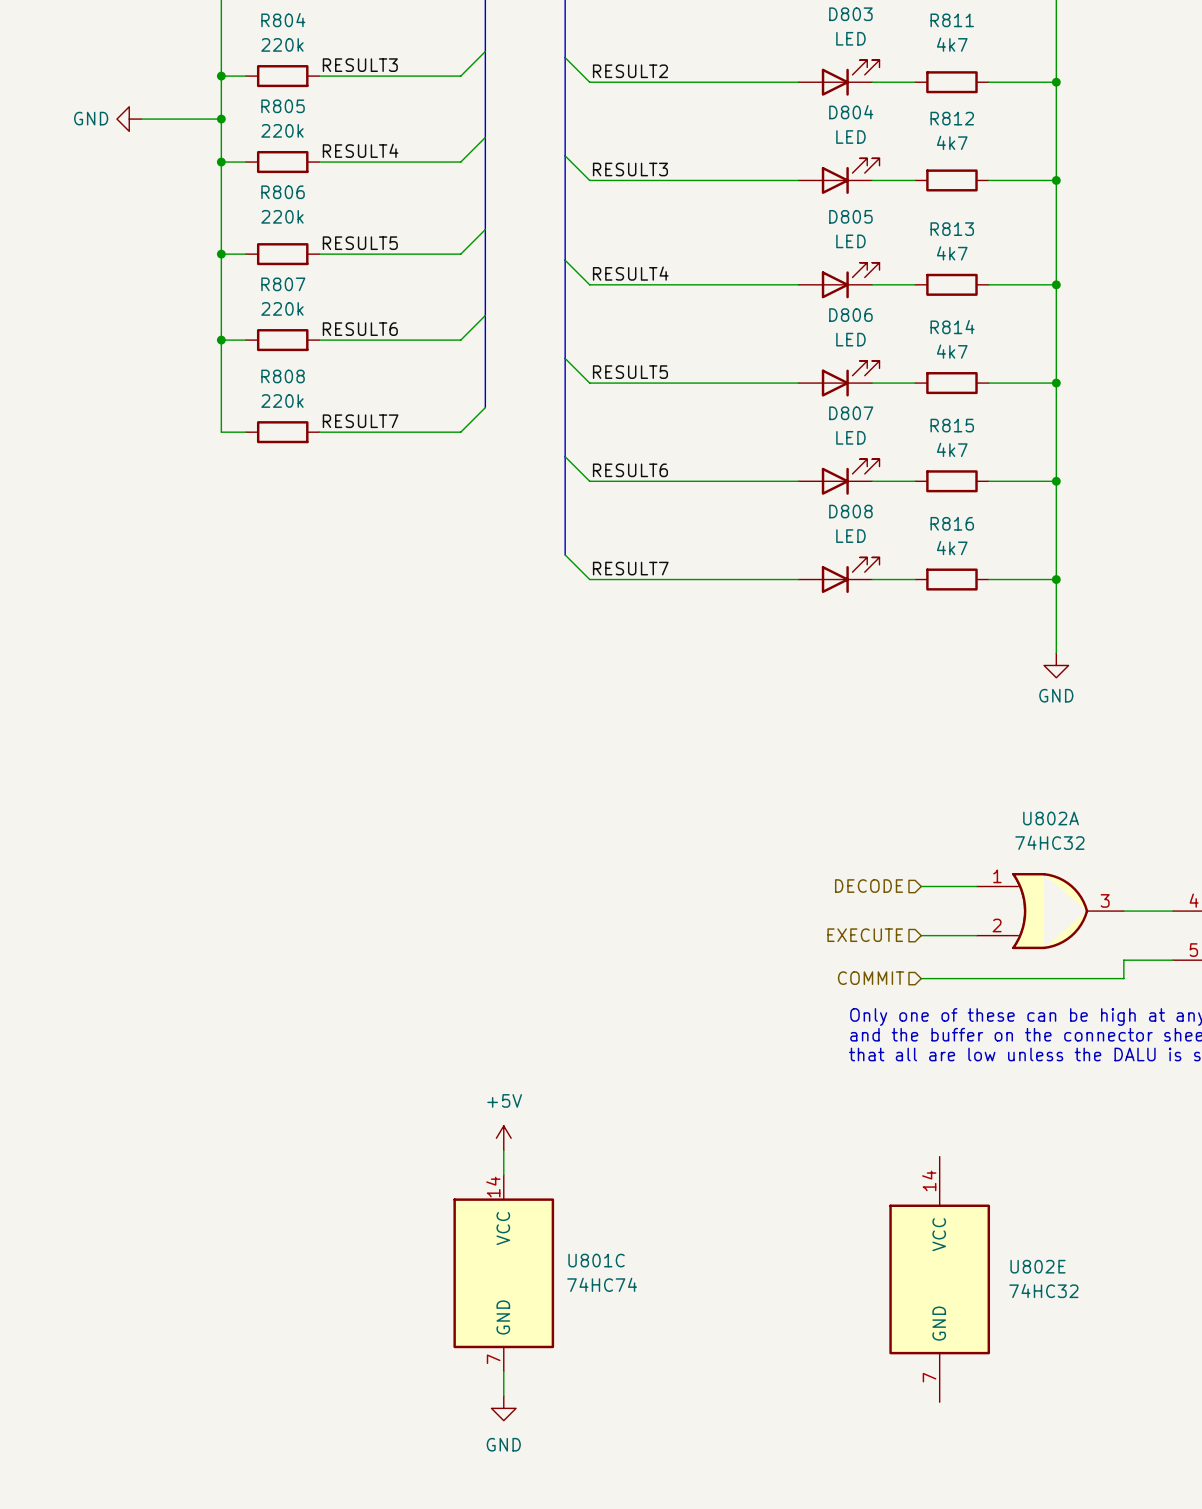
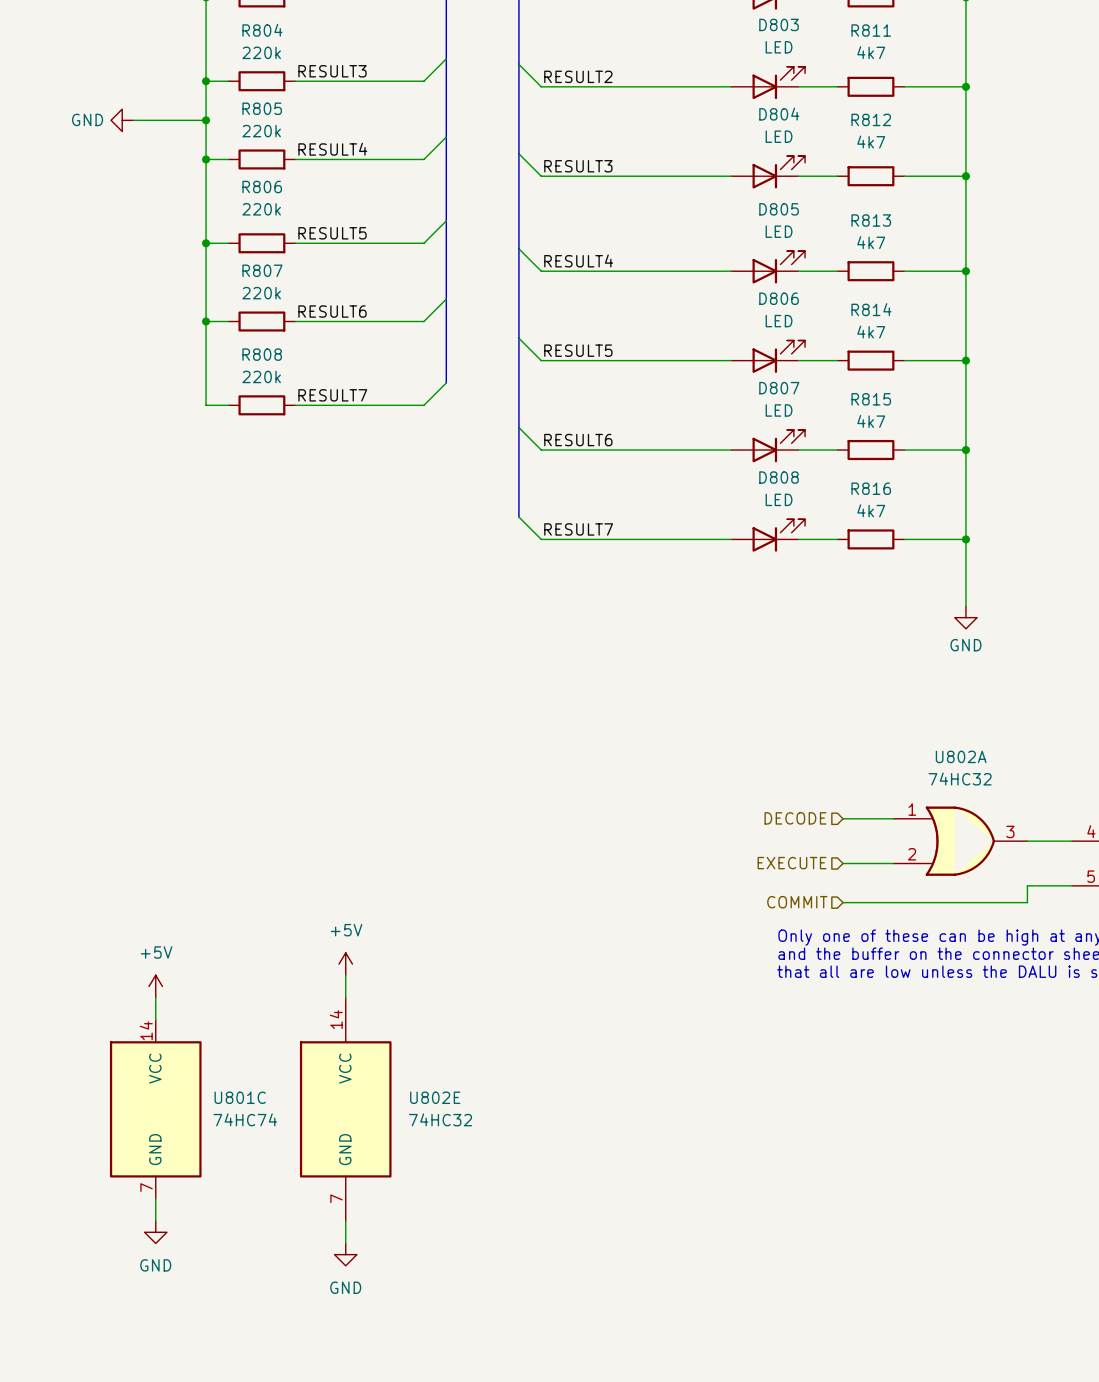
power symbol: none -> +5V (155, 986)
wire: none -> (155, 997) (155, 1019)
power symbol position: +5V (503, 1138) -> +5V (345, 964)
wire: (503, 1150) (503, 1175) -> (345, 975) (345, 997)
U801C position: (503, 1273) -> (155, 1109)
U802E position: (939, 1279) -> (345, 1109)
wire: none -> (155, 1198) (155, 1221)
power symbol: none -> GND (155, 1232)
wire: (503, 1371) (503, 1396) -> (345, 1221) (345, 1243)
power symbol position: GND (503, 1408) -> GND (345, 1254)

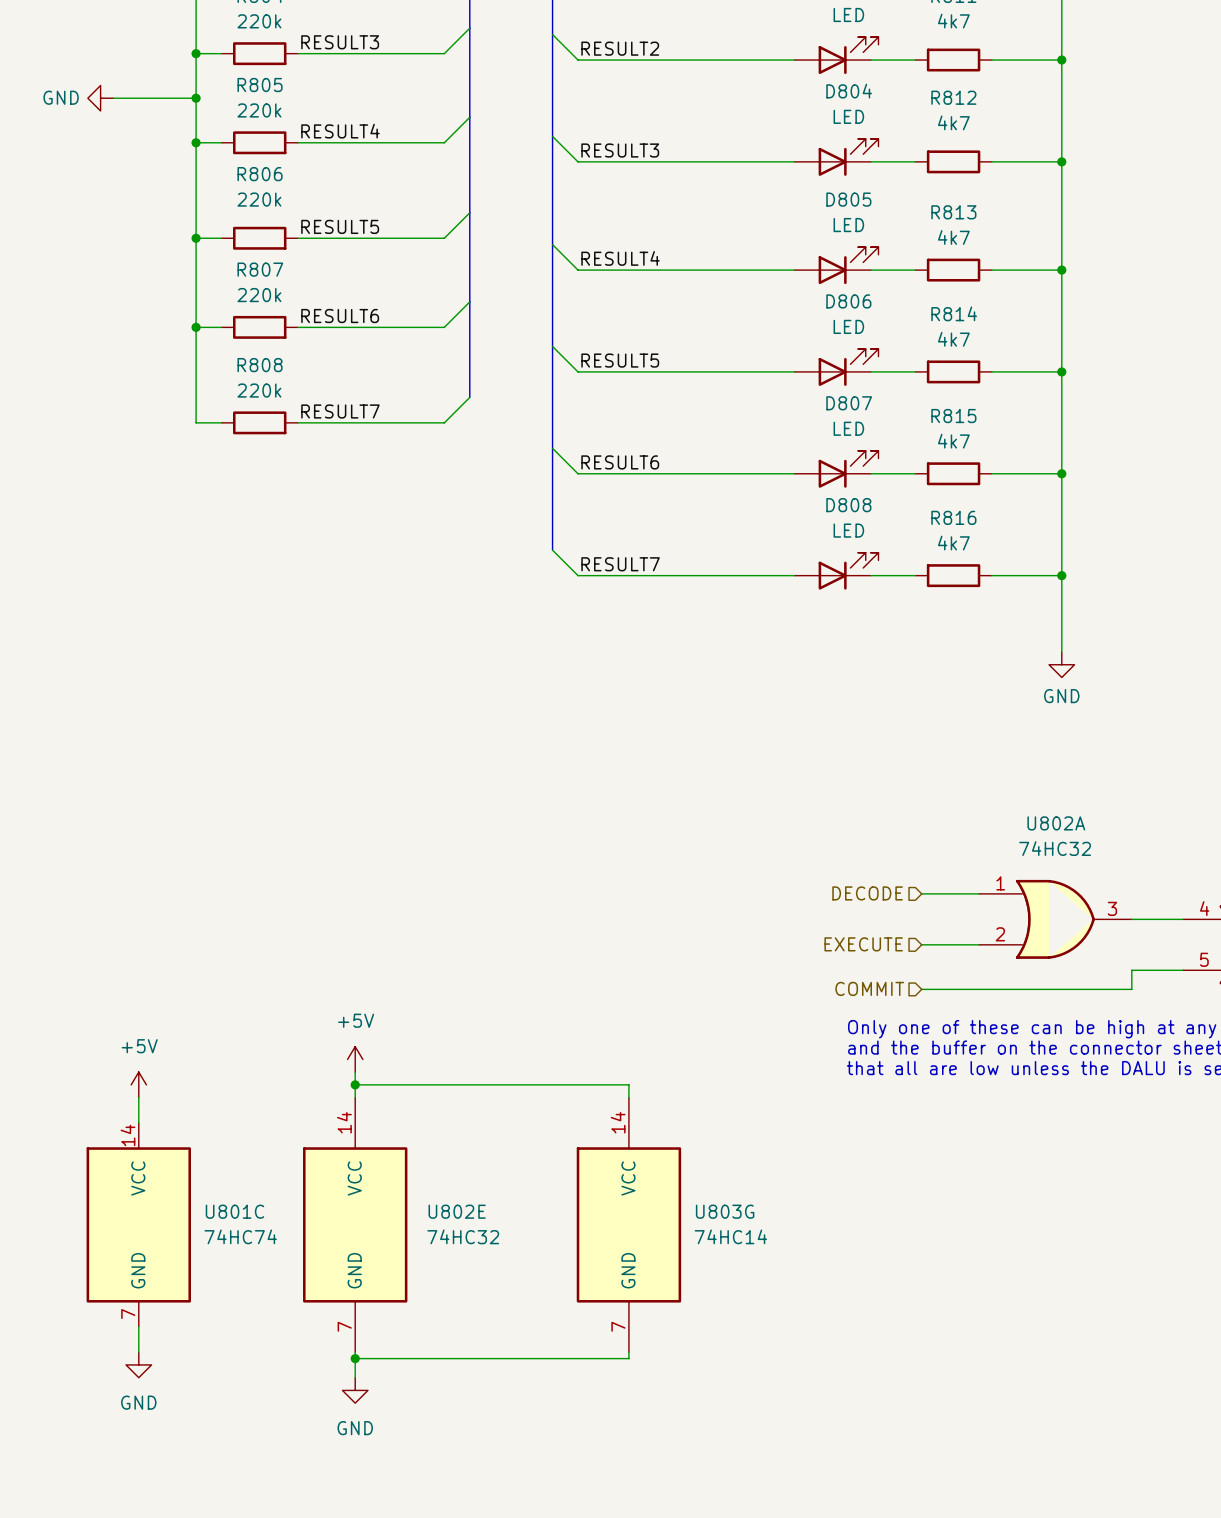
wire: none -> (355, 1084) (628, 1084) (628, 1097)
junction: none -> (355, 1084)
U803G: none -> 74HC14 (628, 1224)
wire: none -> (628, 1352) (628, 1358) (355, 1358)
junction: none -> (355, 1358)

